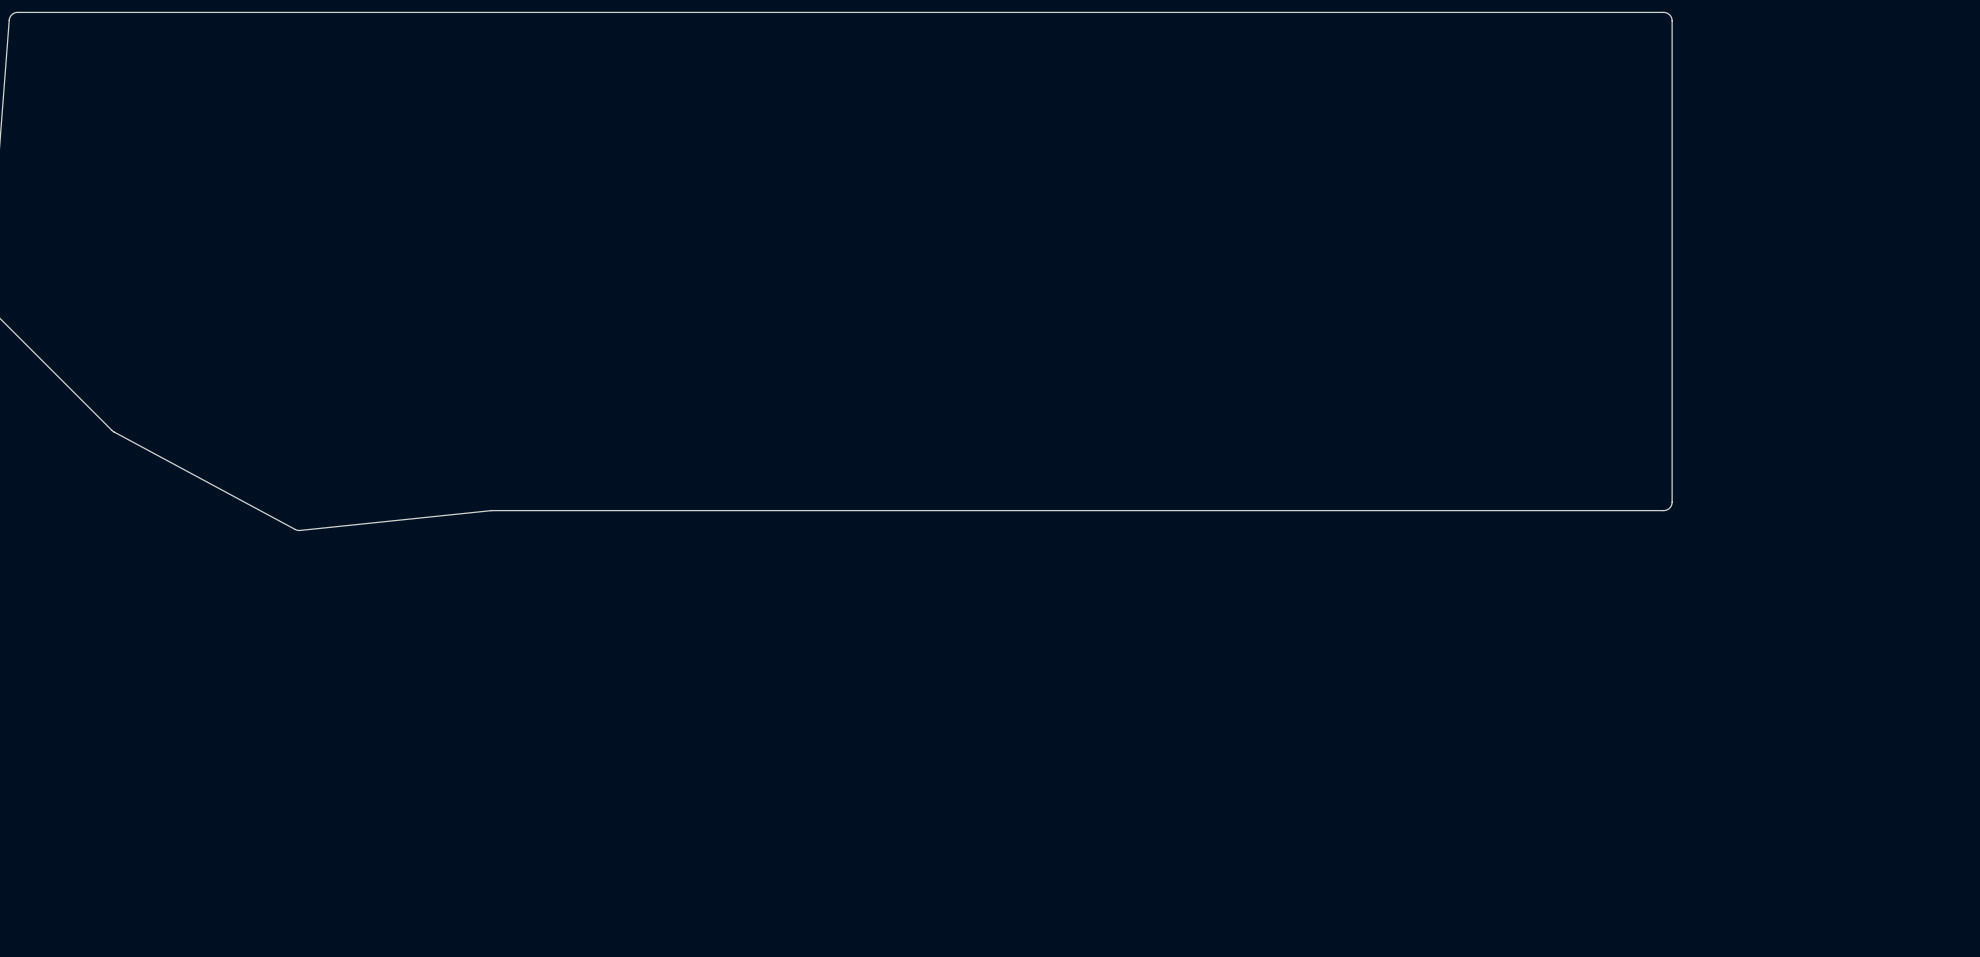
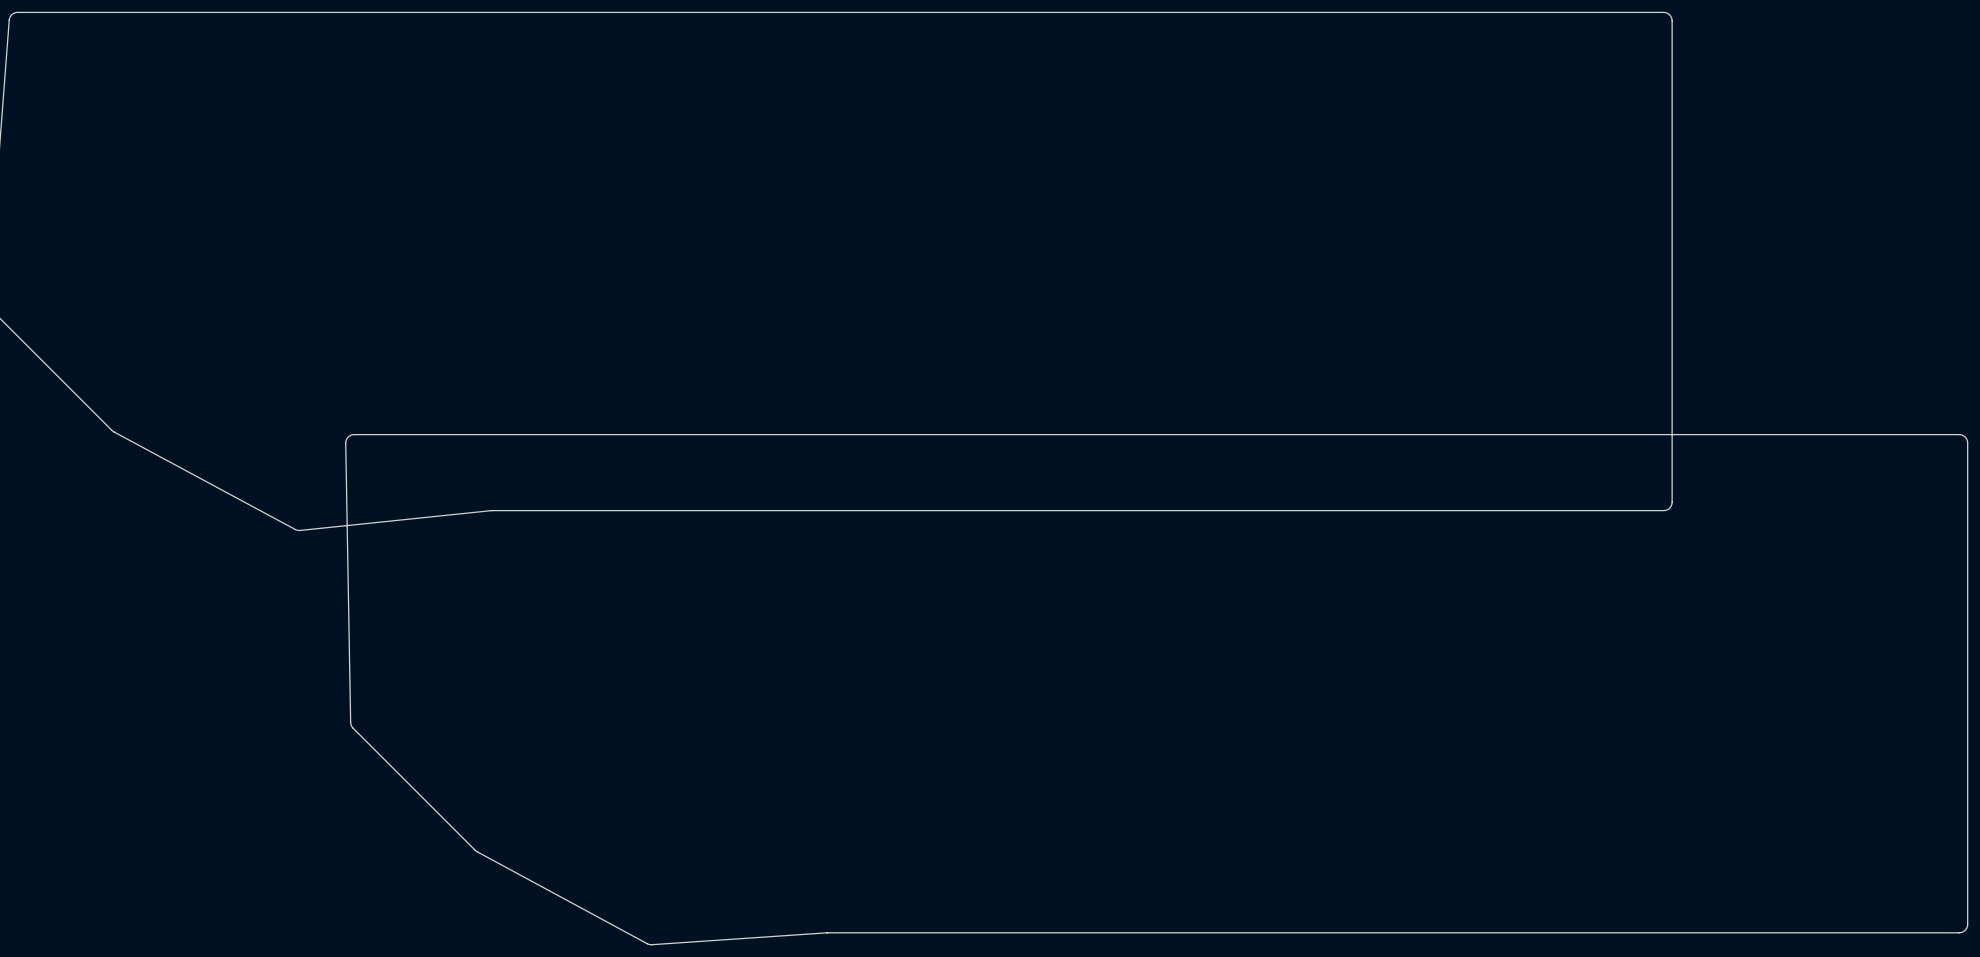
board edge: none -> (1959, 434) (352, 434) (347, 437) (345, 443) (350, 723) (353, 728) (476, 851) (650, 944) (827, 932) (1960, 932) (1965, 930) (1967, 924) (1967, 443) (1965, 437) (1959, 434)

